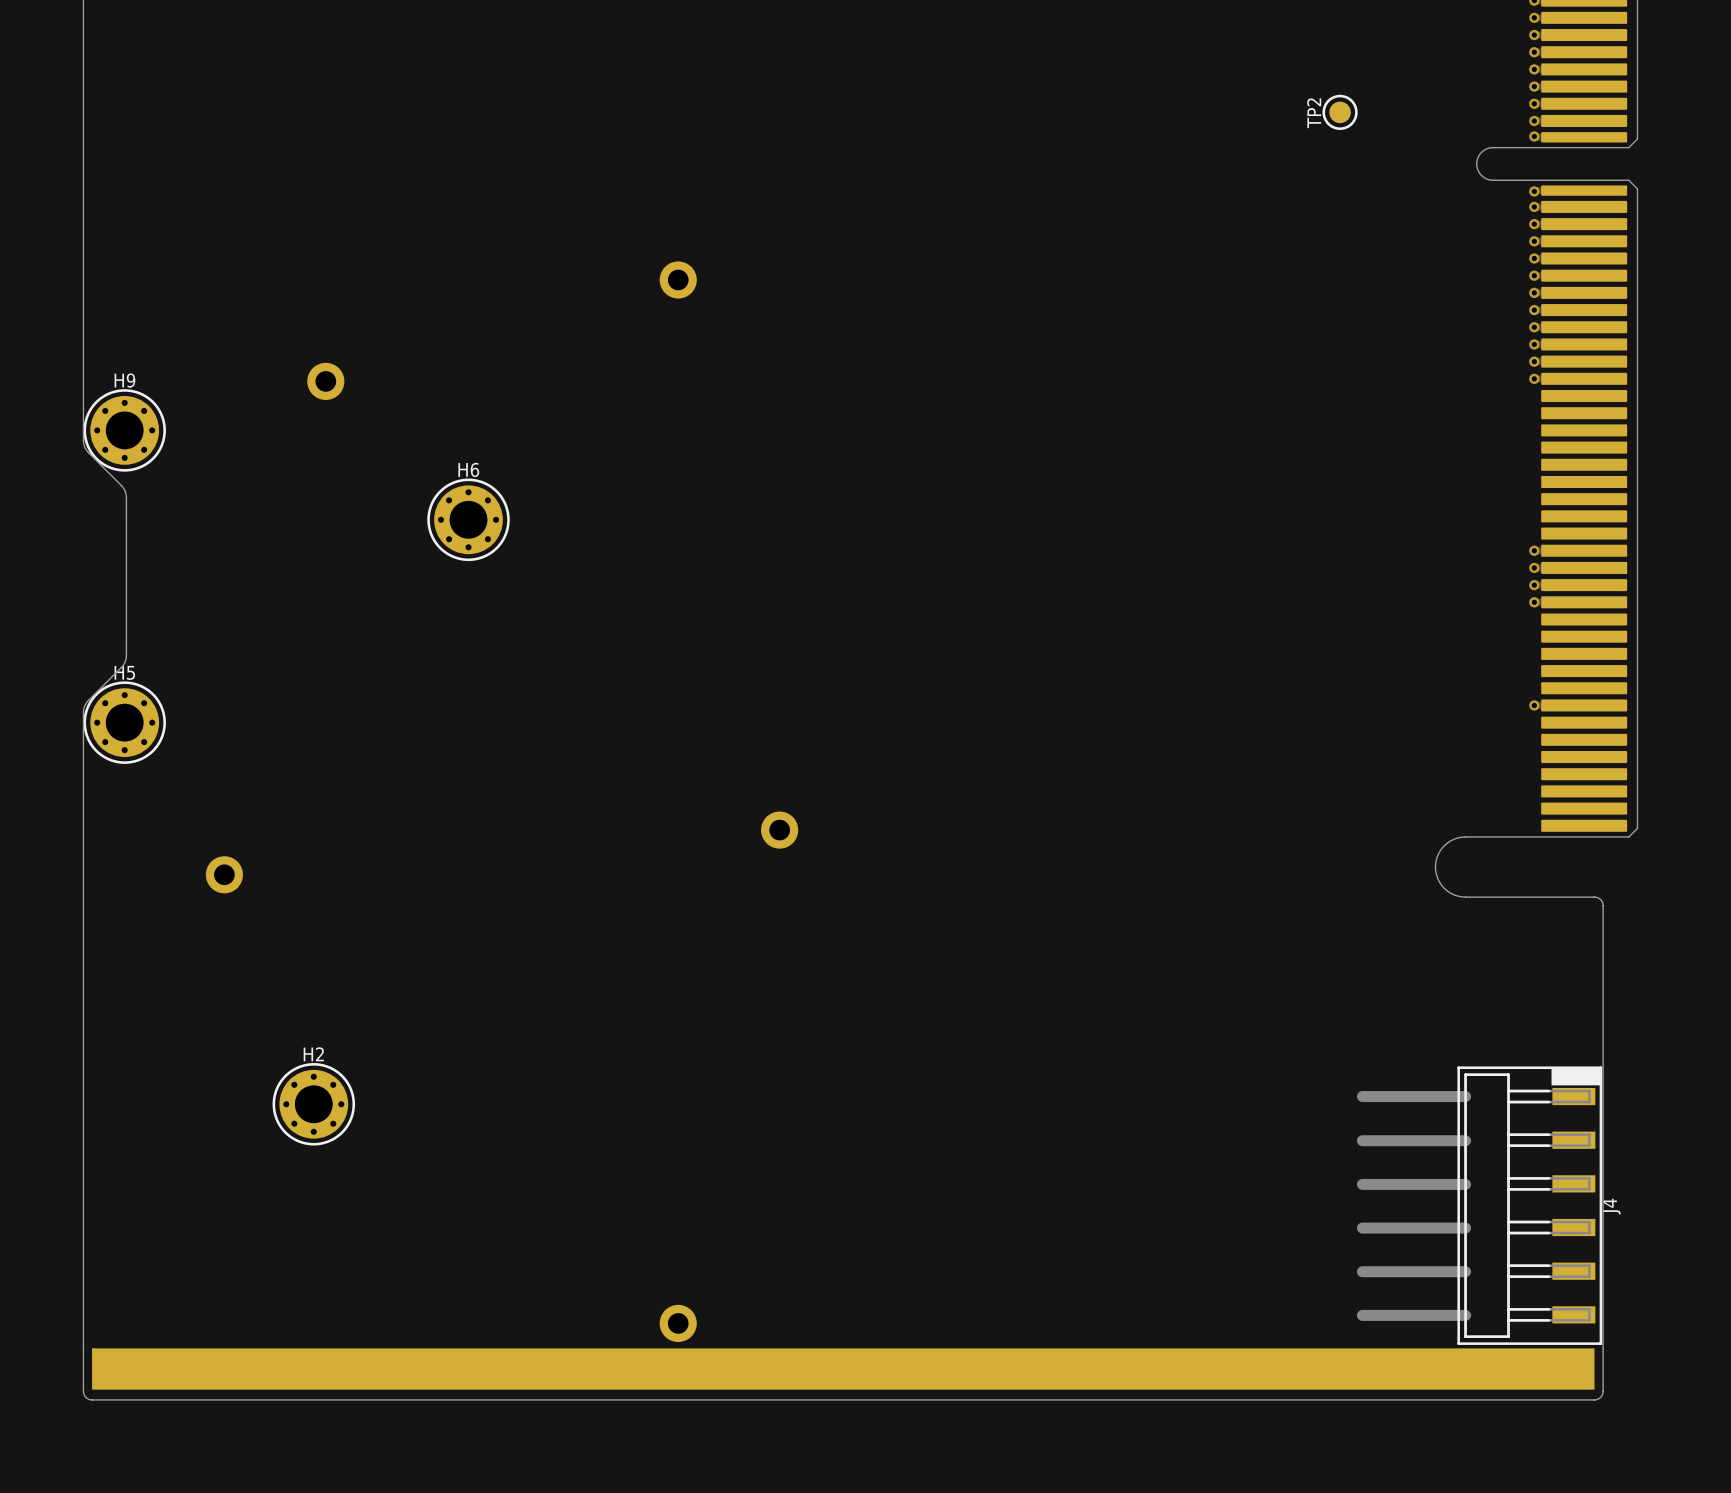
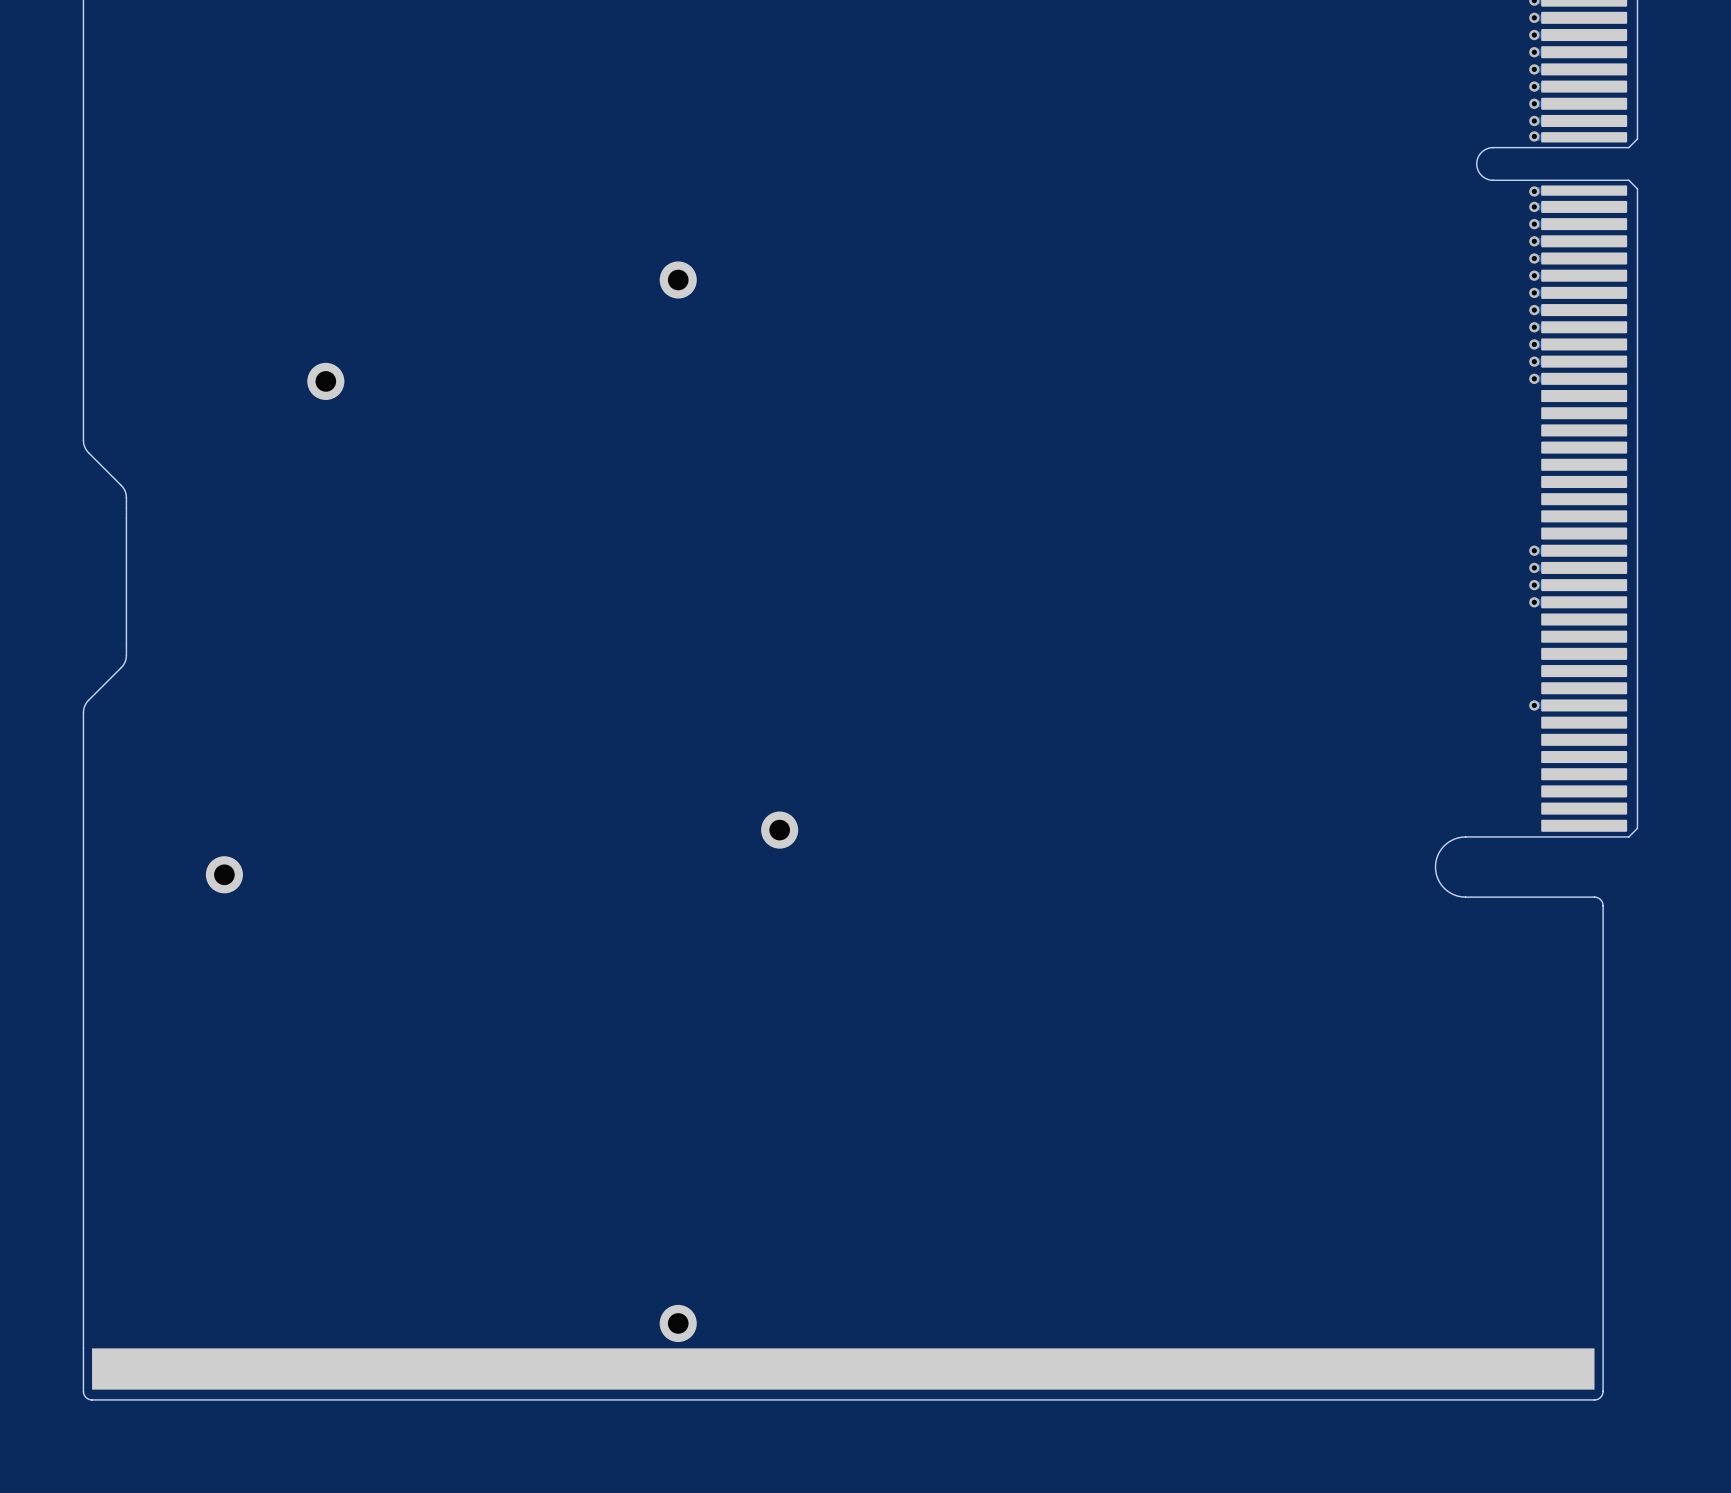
TP2: (1340, 112) -> none
H9: (124, 430) -> none
H6: (468, 519) -> none
H5: (124, 722) -> none
H2: (313, 1104) -> none
J4: (1479, 1205) -> none

